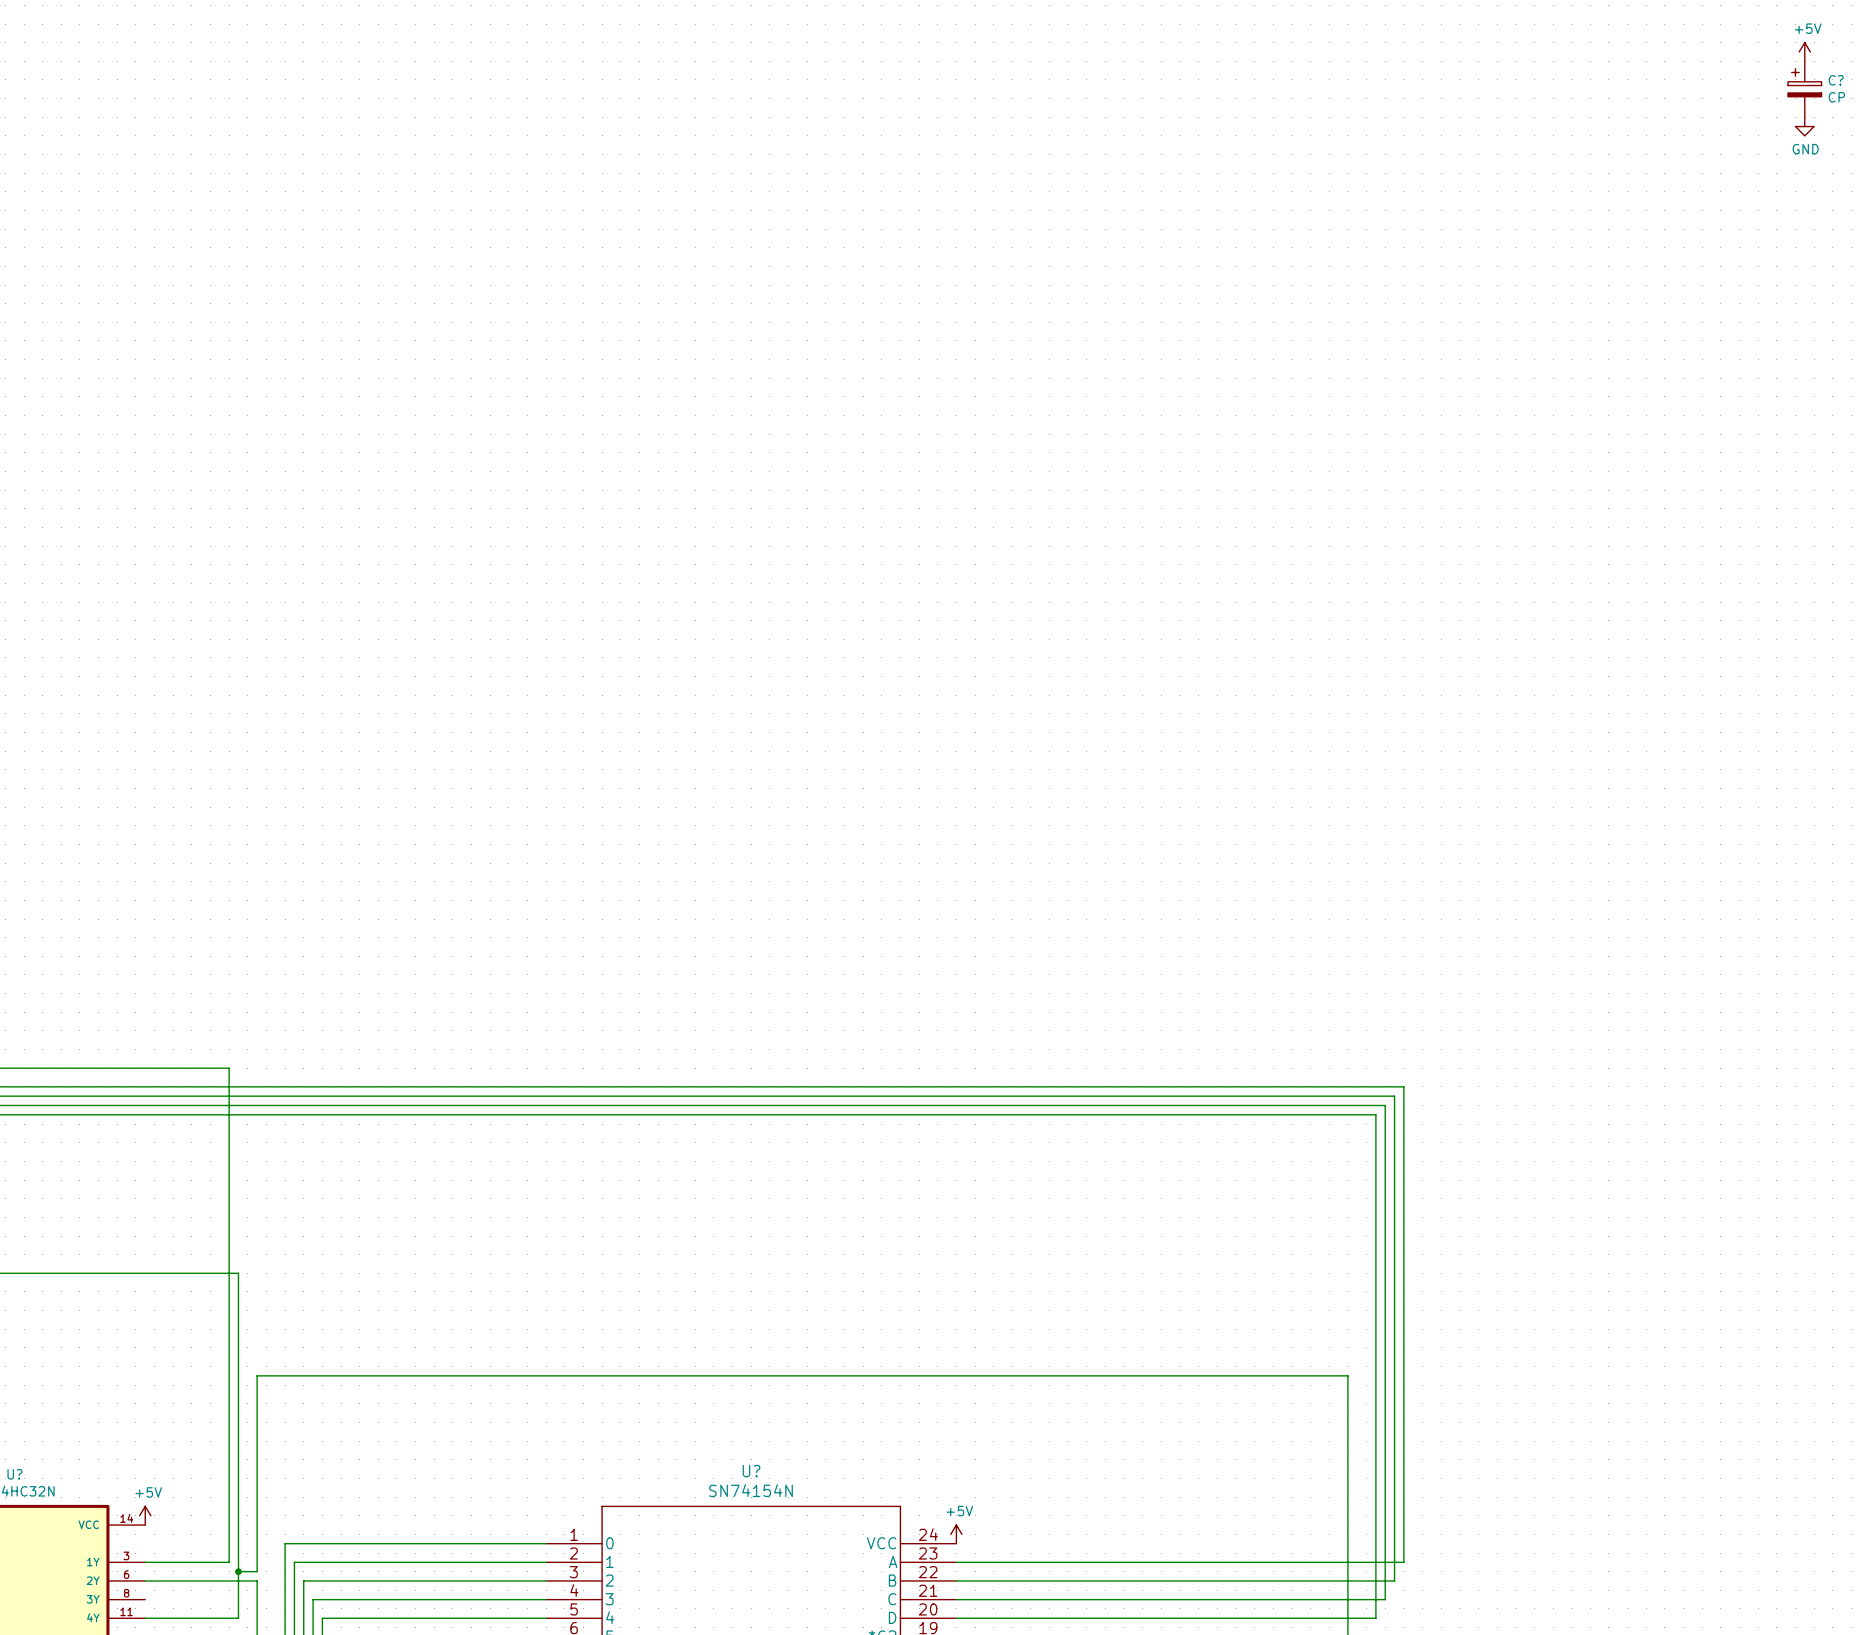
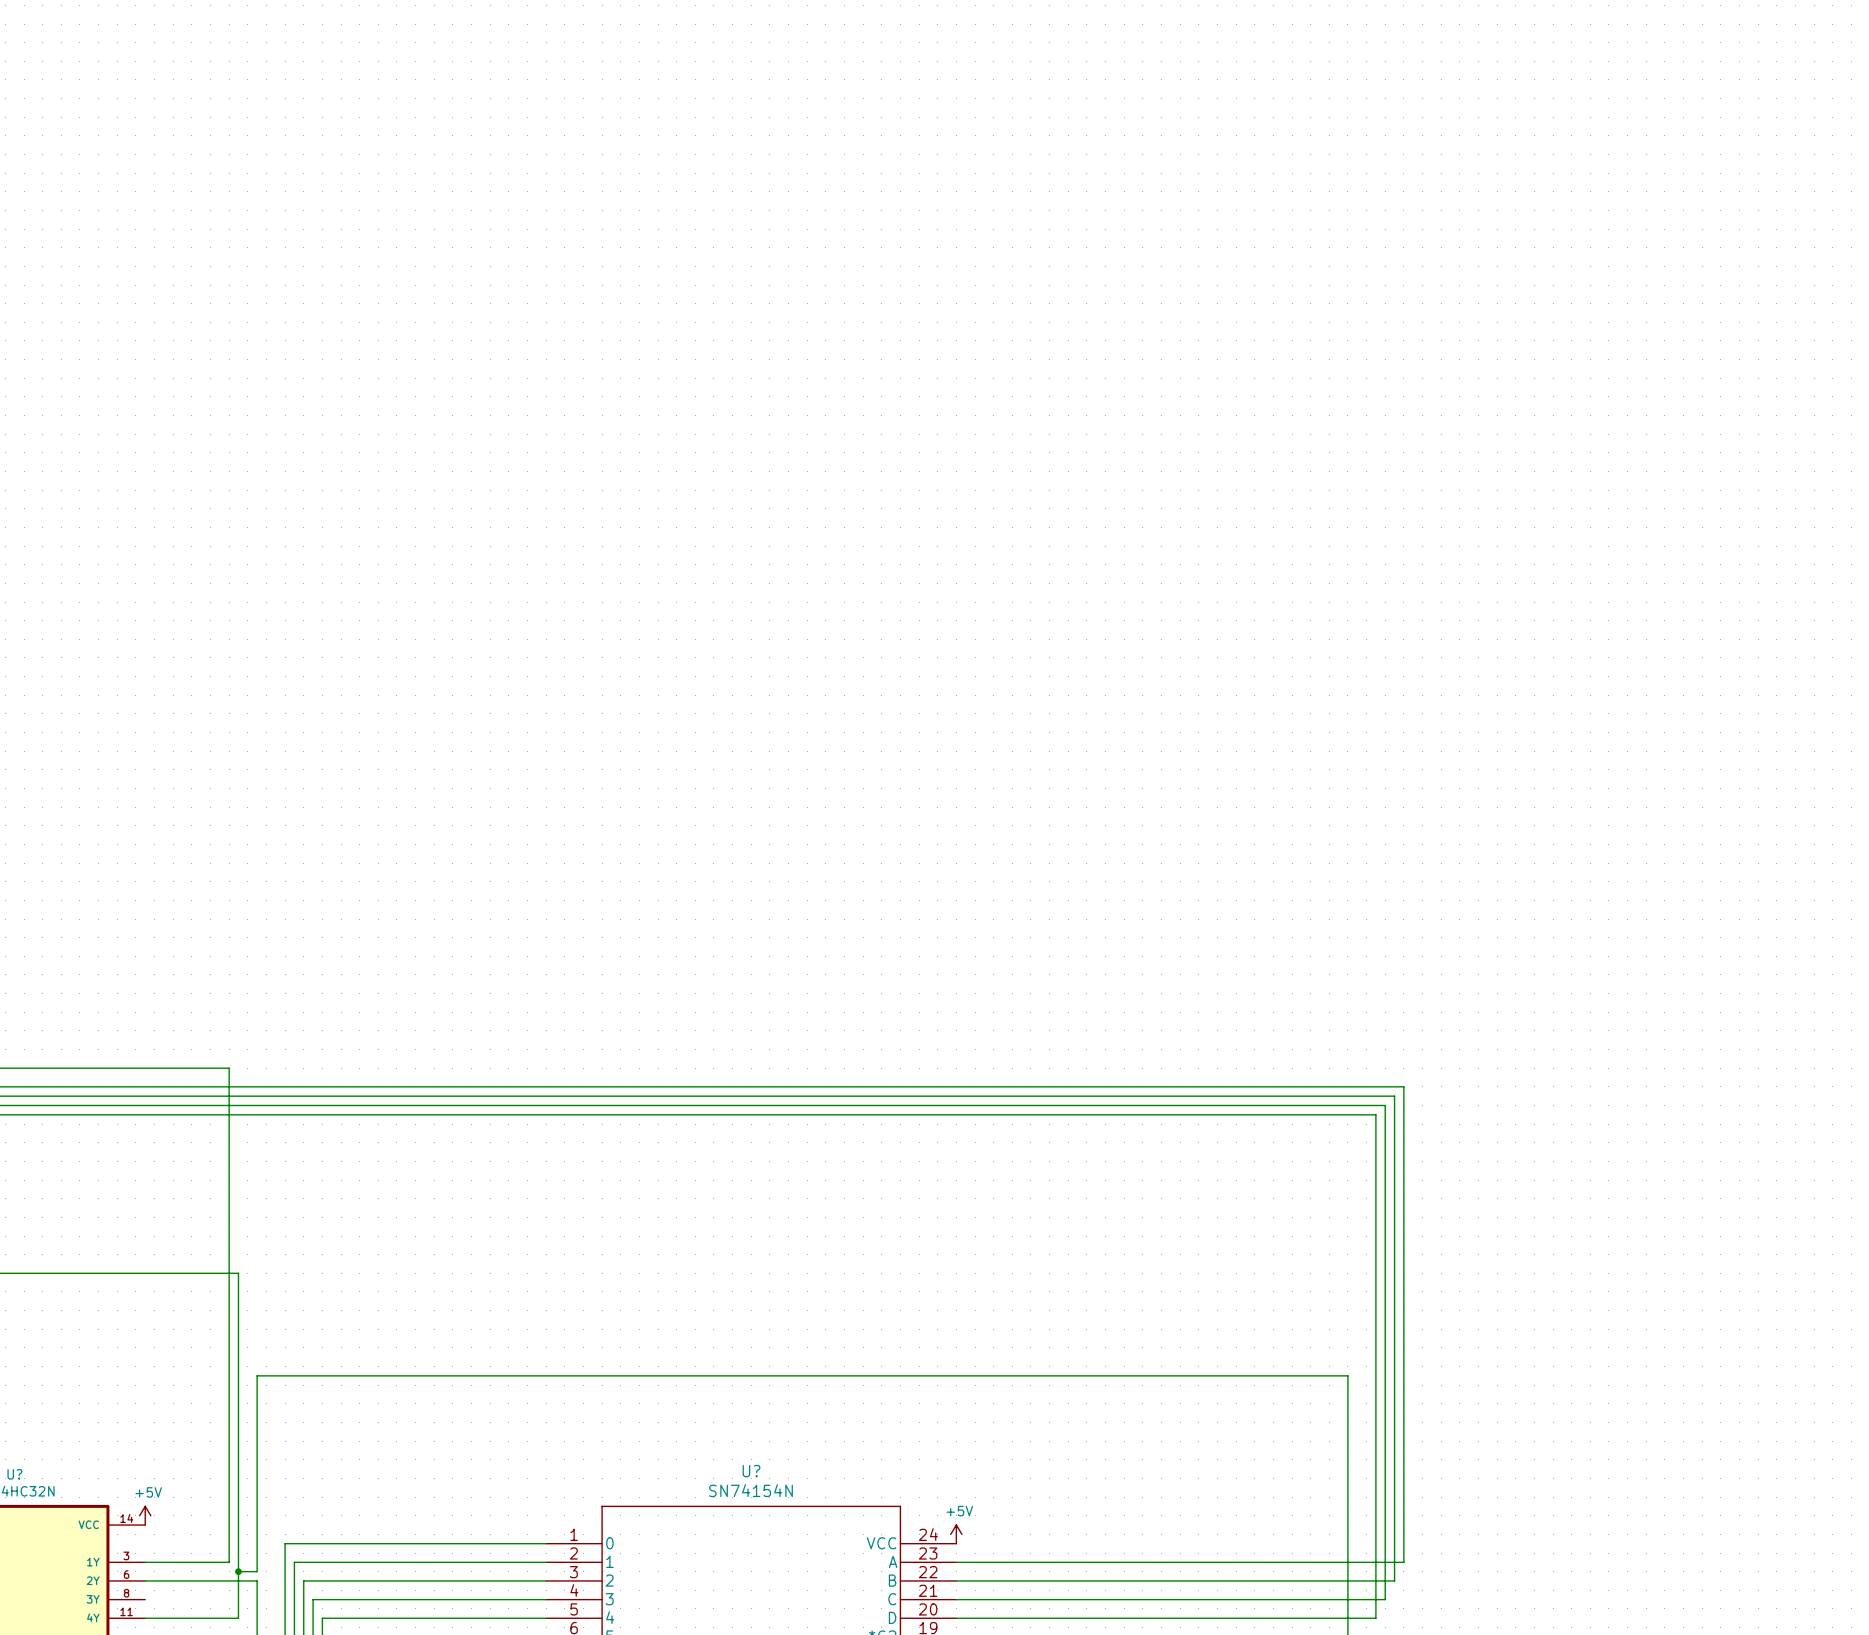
power symbol: +5V (1804, 51) -> none
C?: CP (1804, 89) -> none
power symbol: GND (1804, 126) -> none

